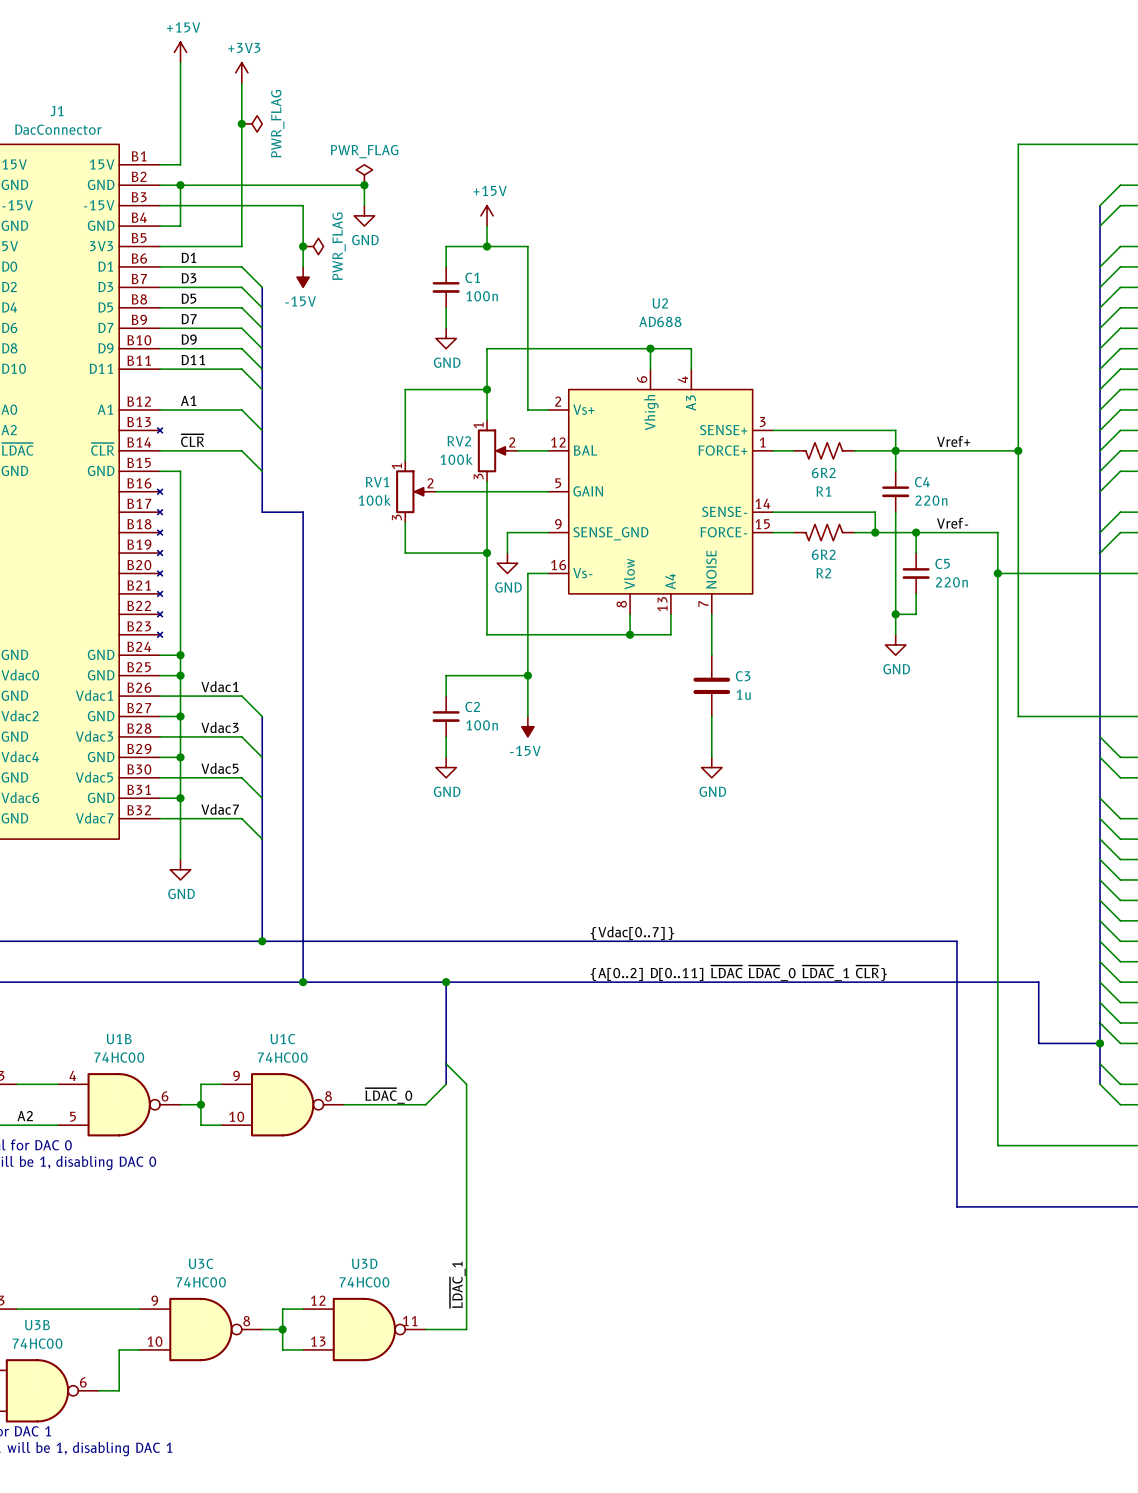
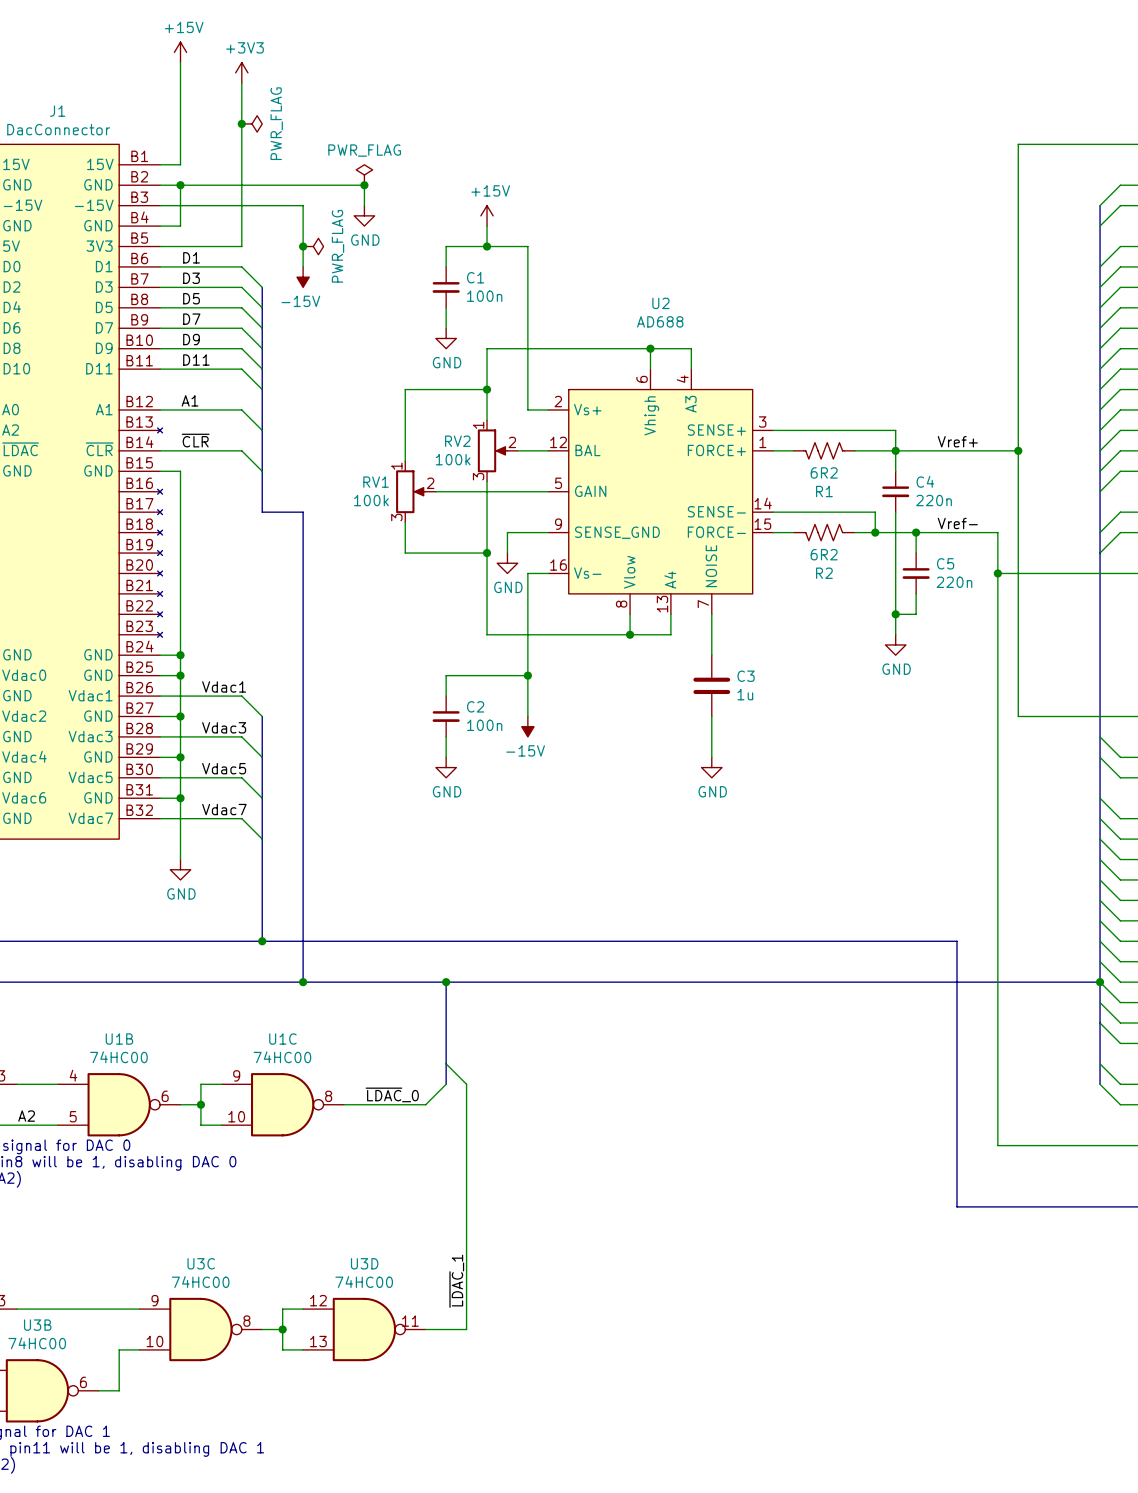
label: {Vdac[0..7]} (632, 933) -> none
label: {A[0..2] D[0..11] ~{LDAC} ~{LDAC}_0 ~{LDAC}_1 ~{CLR}} (738, 973) -> none
bus: (1038, 982) (1038, 1043) (1100, 1043) -> (1038, 982) (1100, 982)
junction: none -> (1100, 982)
junction: (1100, 1043) -> none

